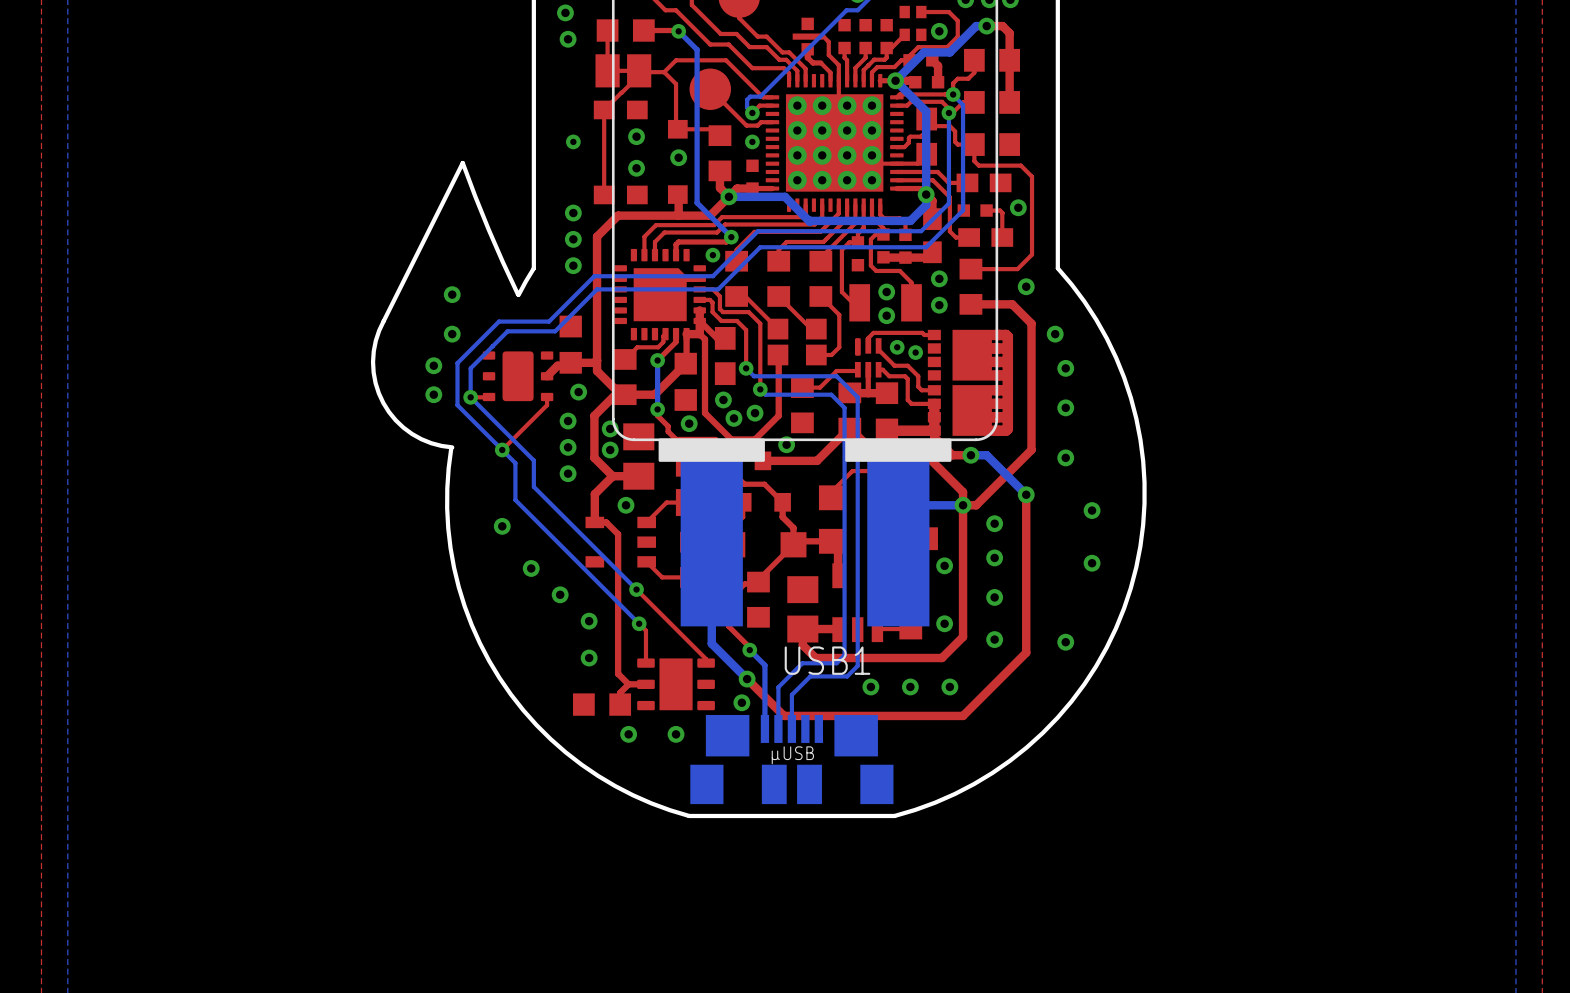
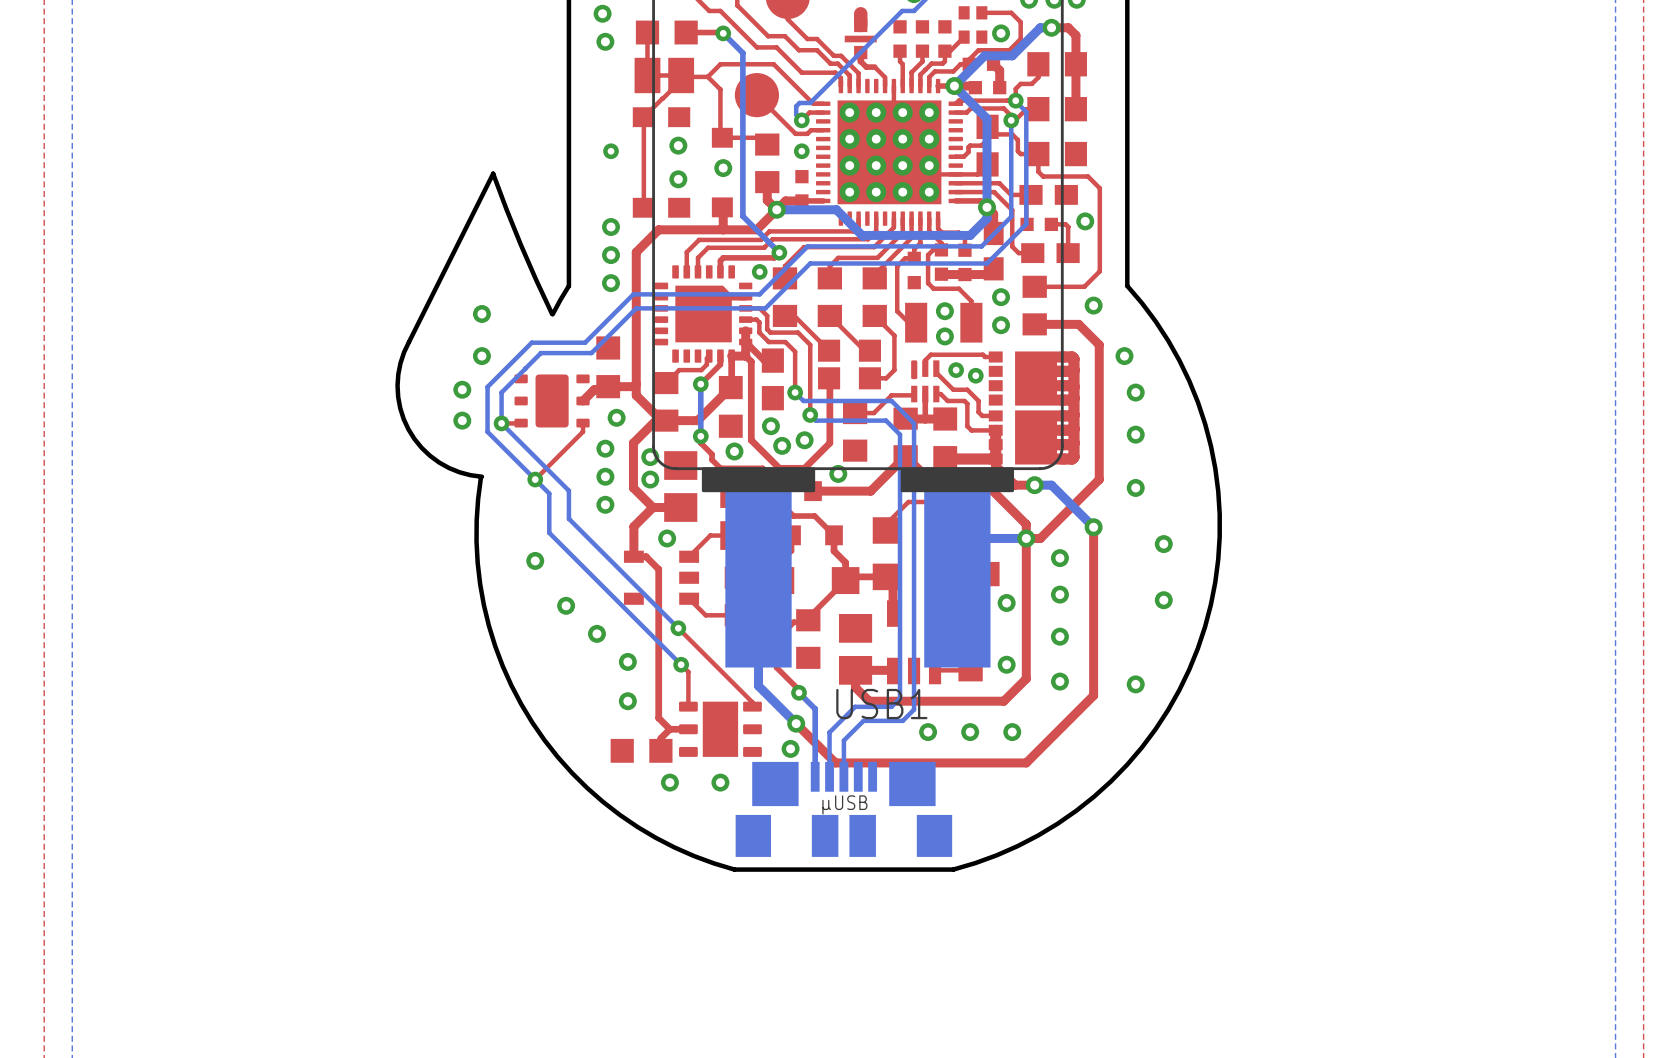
top track: none -> (860, 13) (860, 25)
top track: (815, 36) (823, 36) (828, 41) (828, 55) (838, 65) (838, 80) -> none

